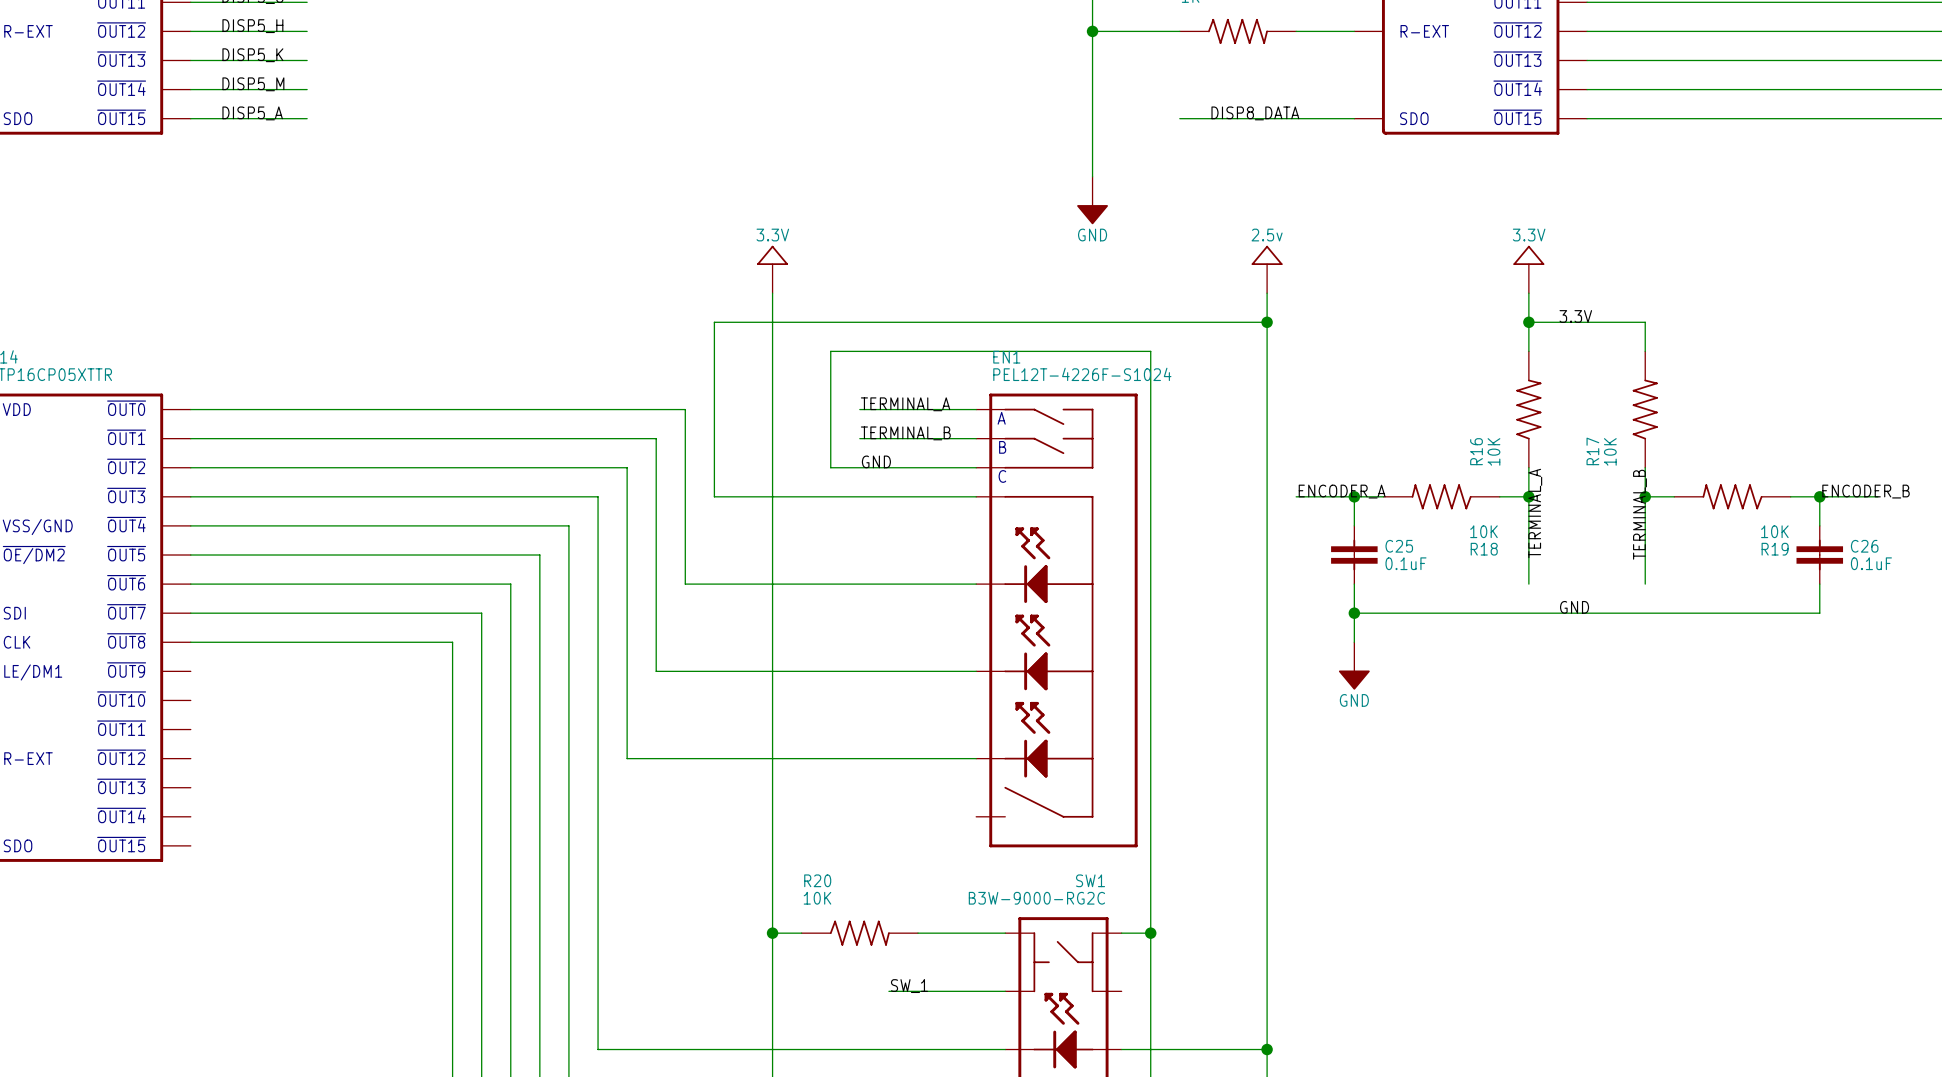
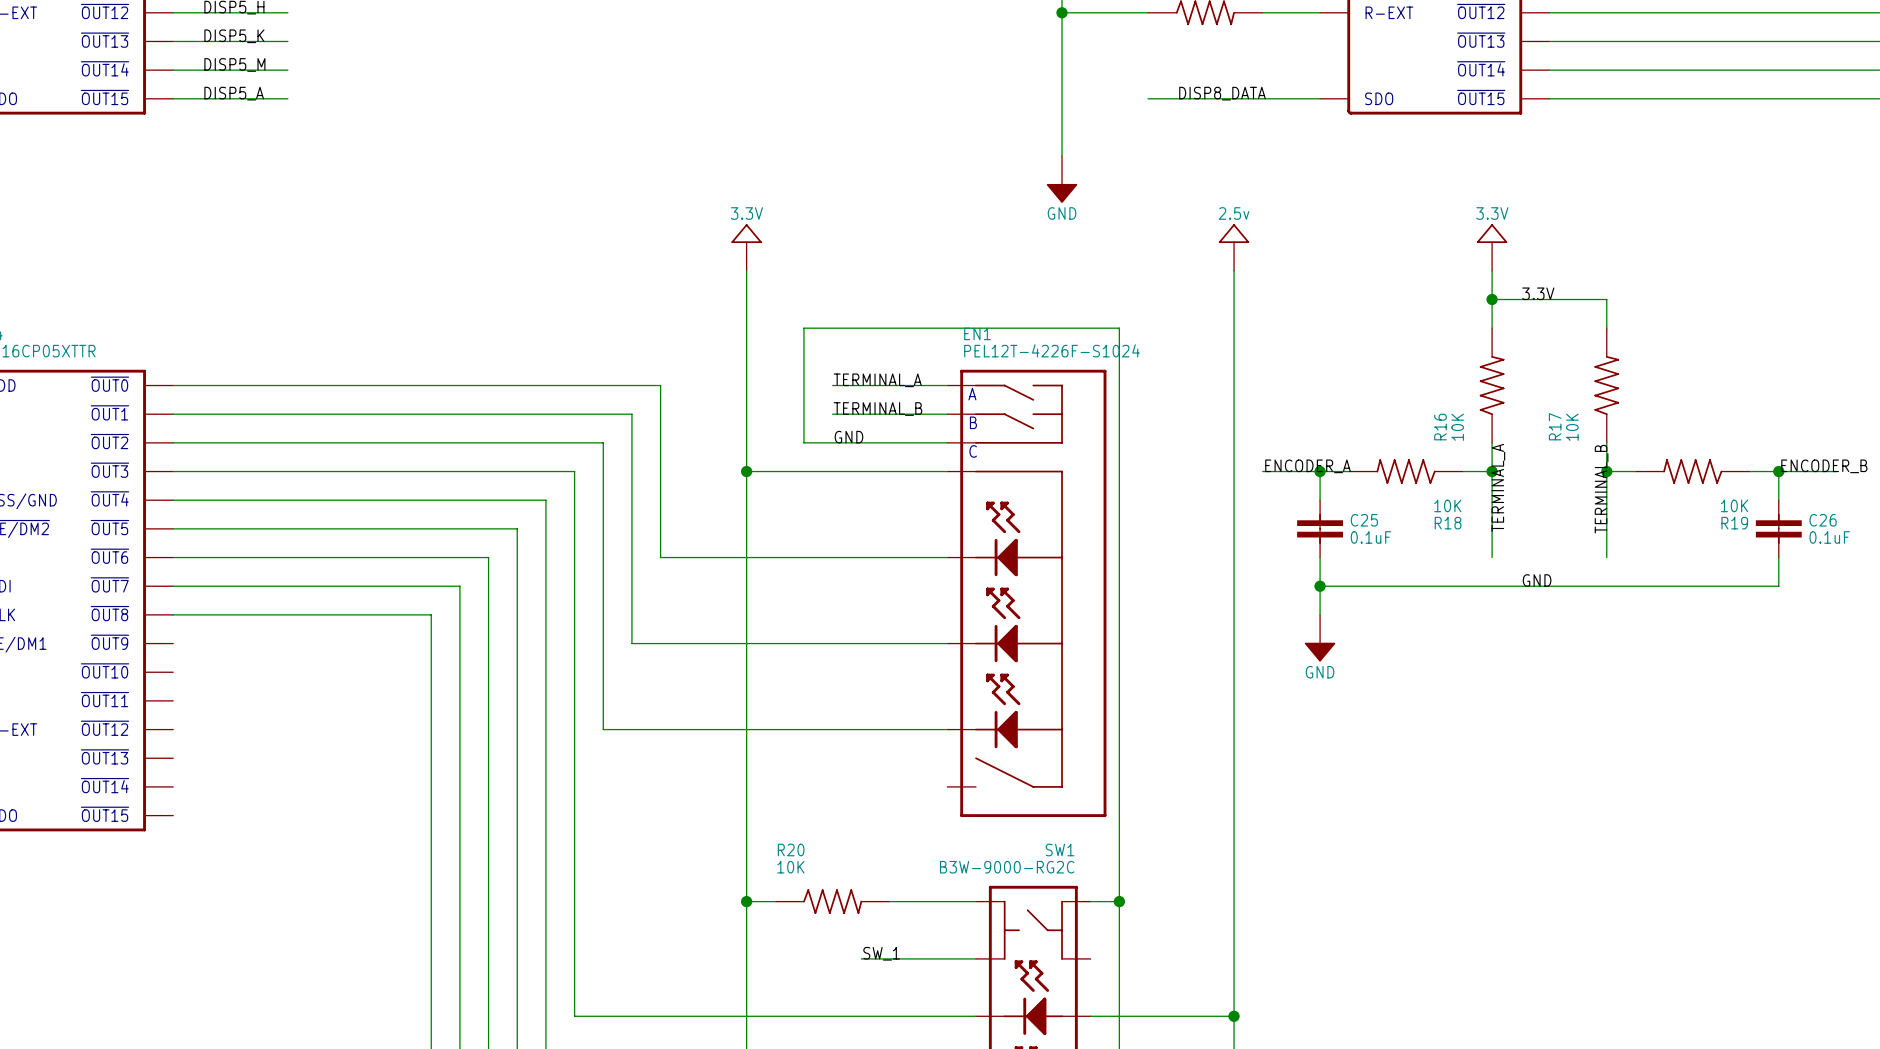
wire: (1267, 322) (714, 322) (714, 496) (772, 496) -> none
junction: (1267, 322) -> none
junction: none -> (746, 471)

